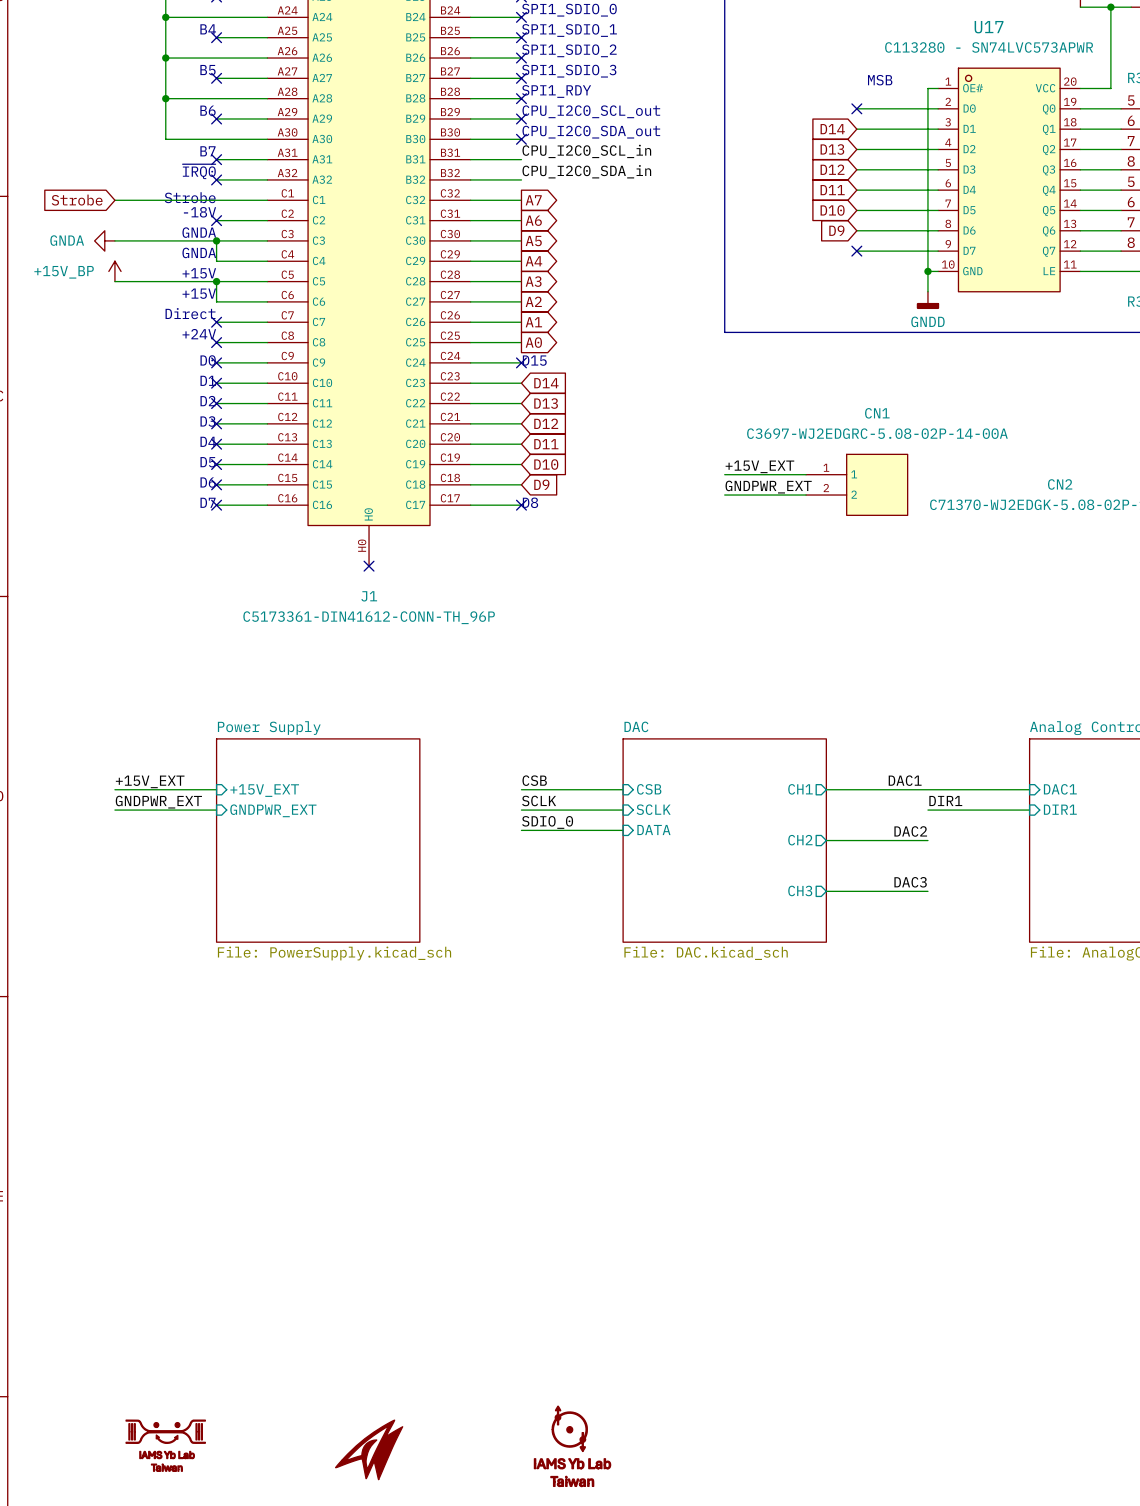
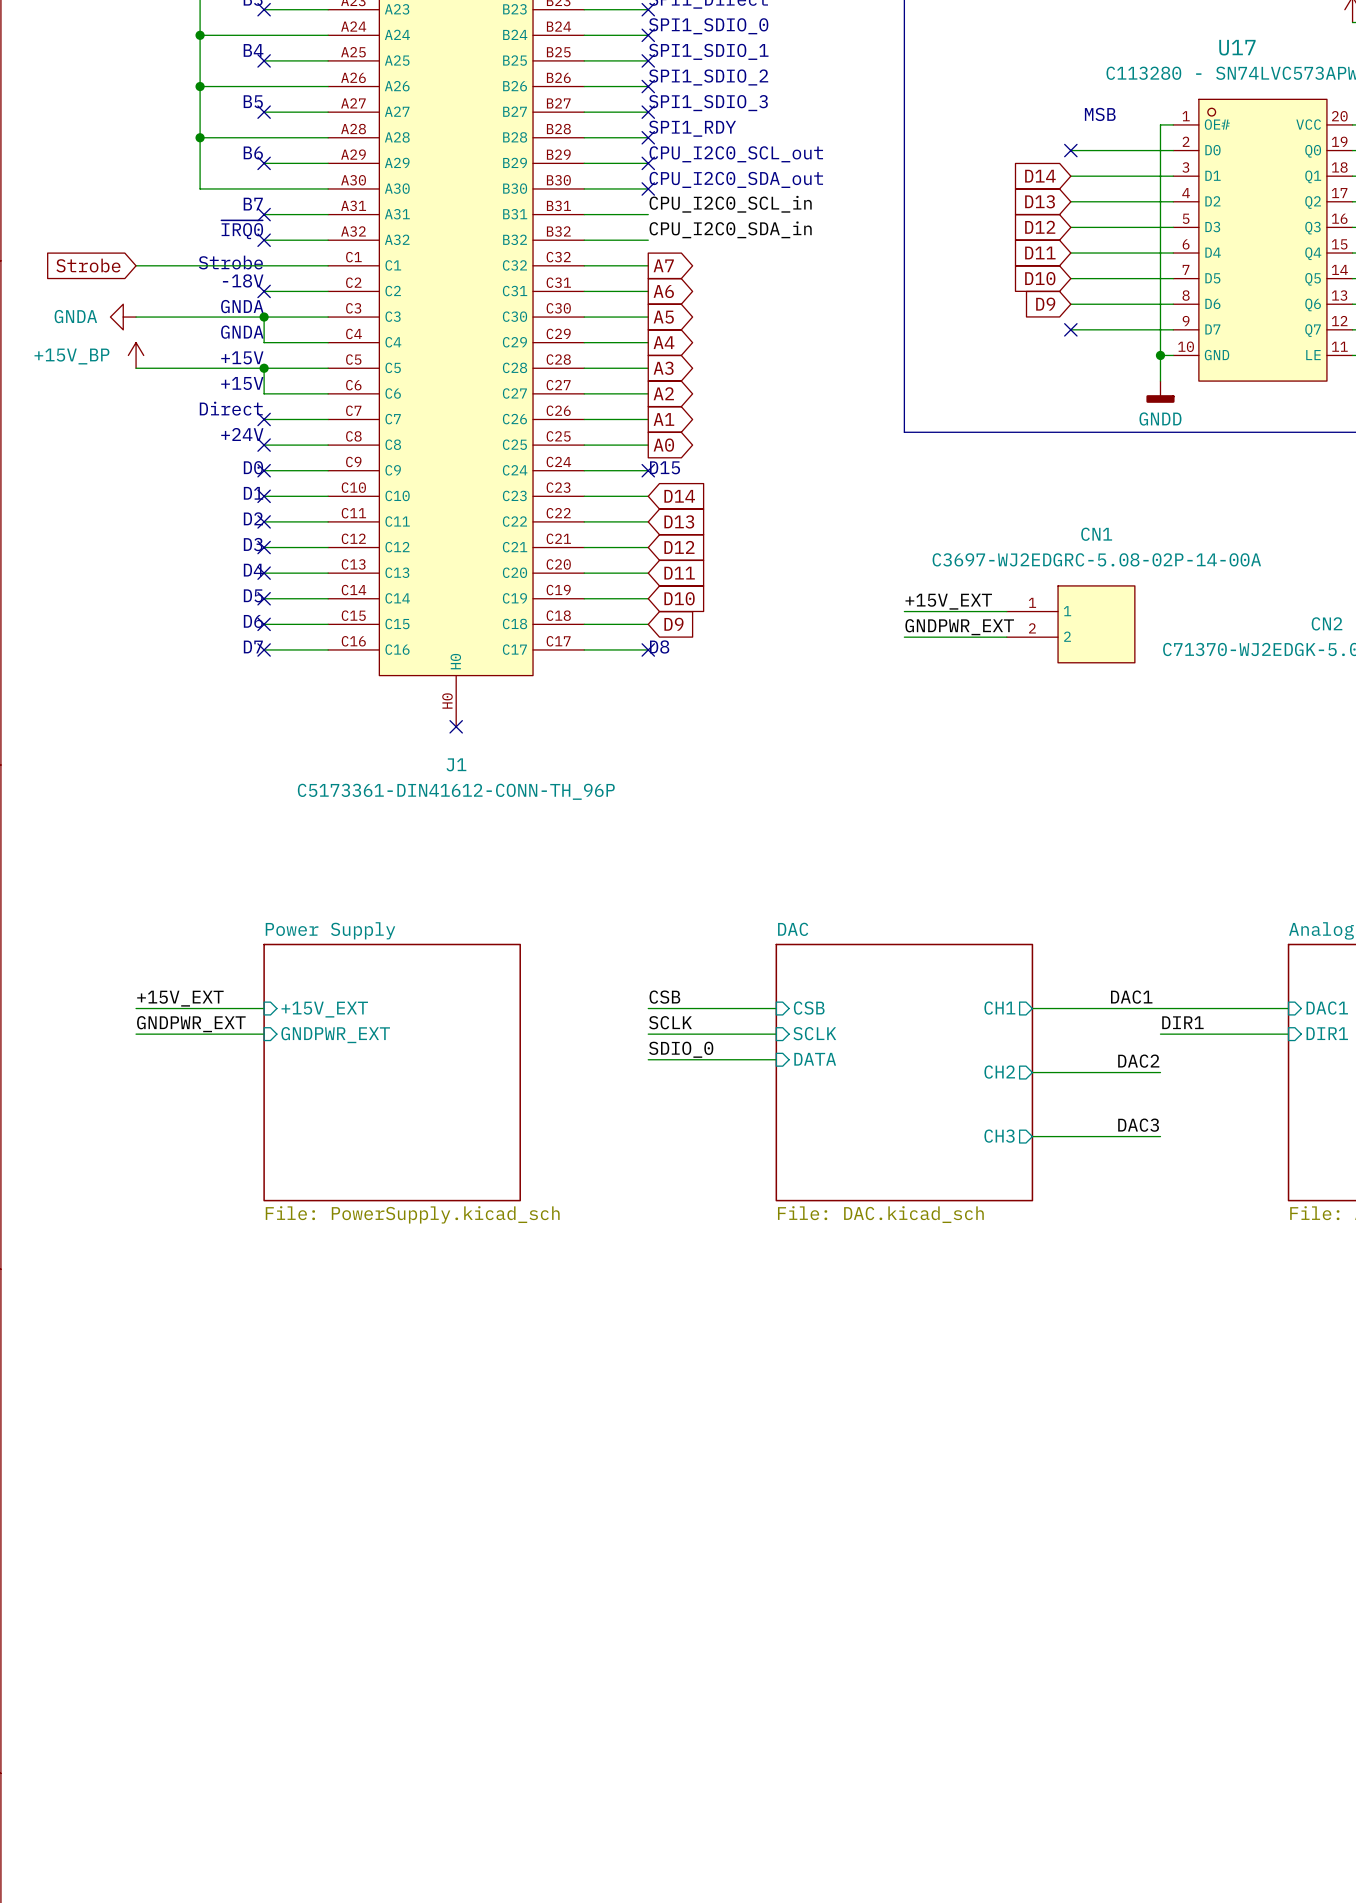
part: (165, 1445) -> none
part: (572, 1446) -> none
part: (369, 1449) -> none

